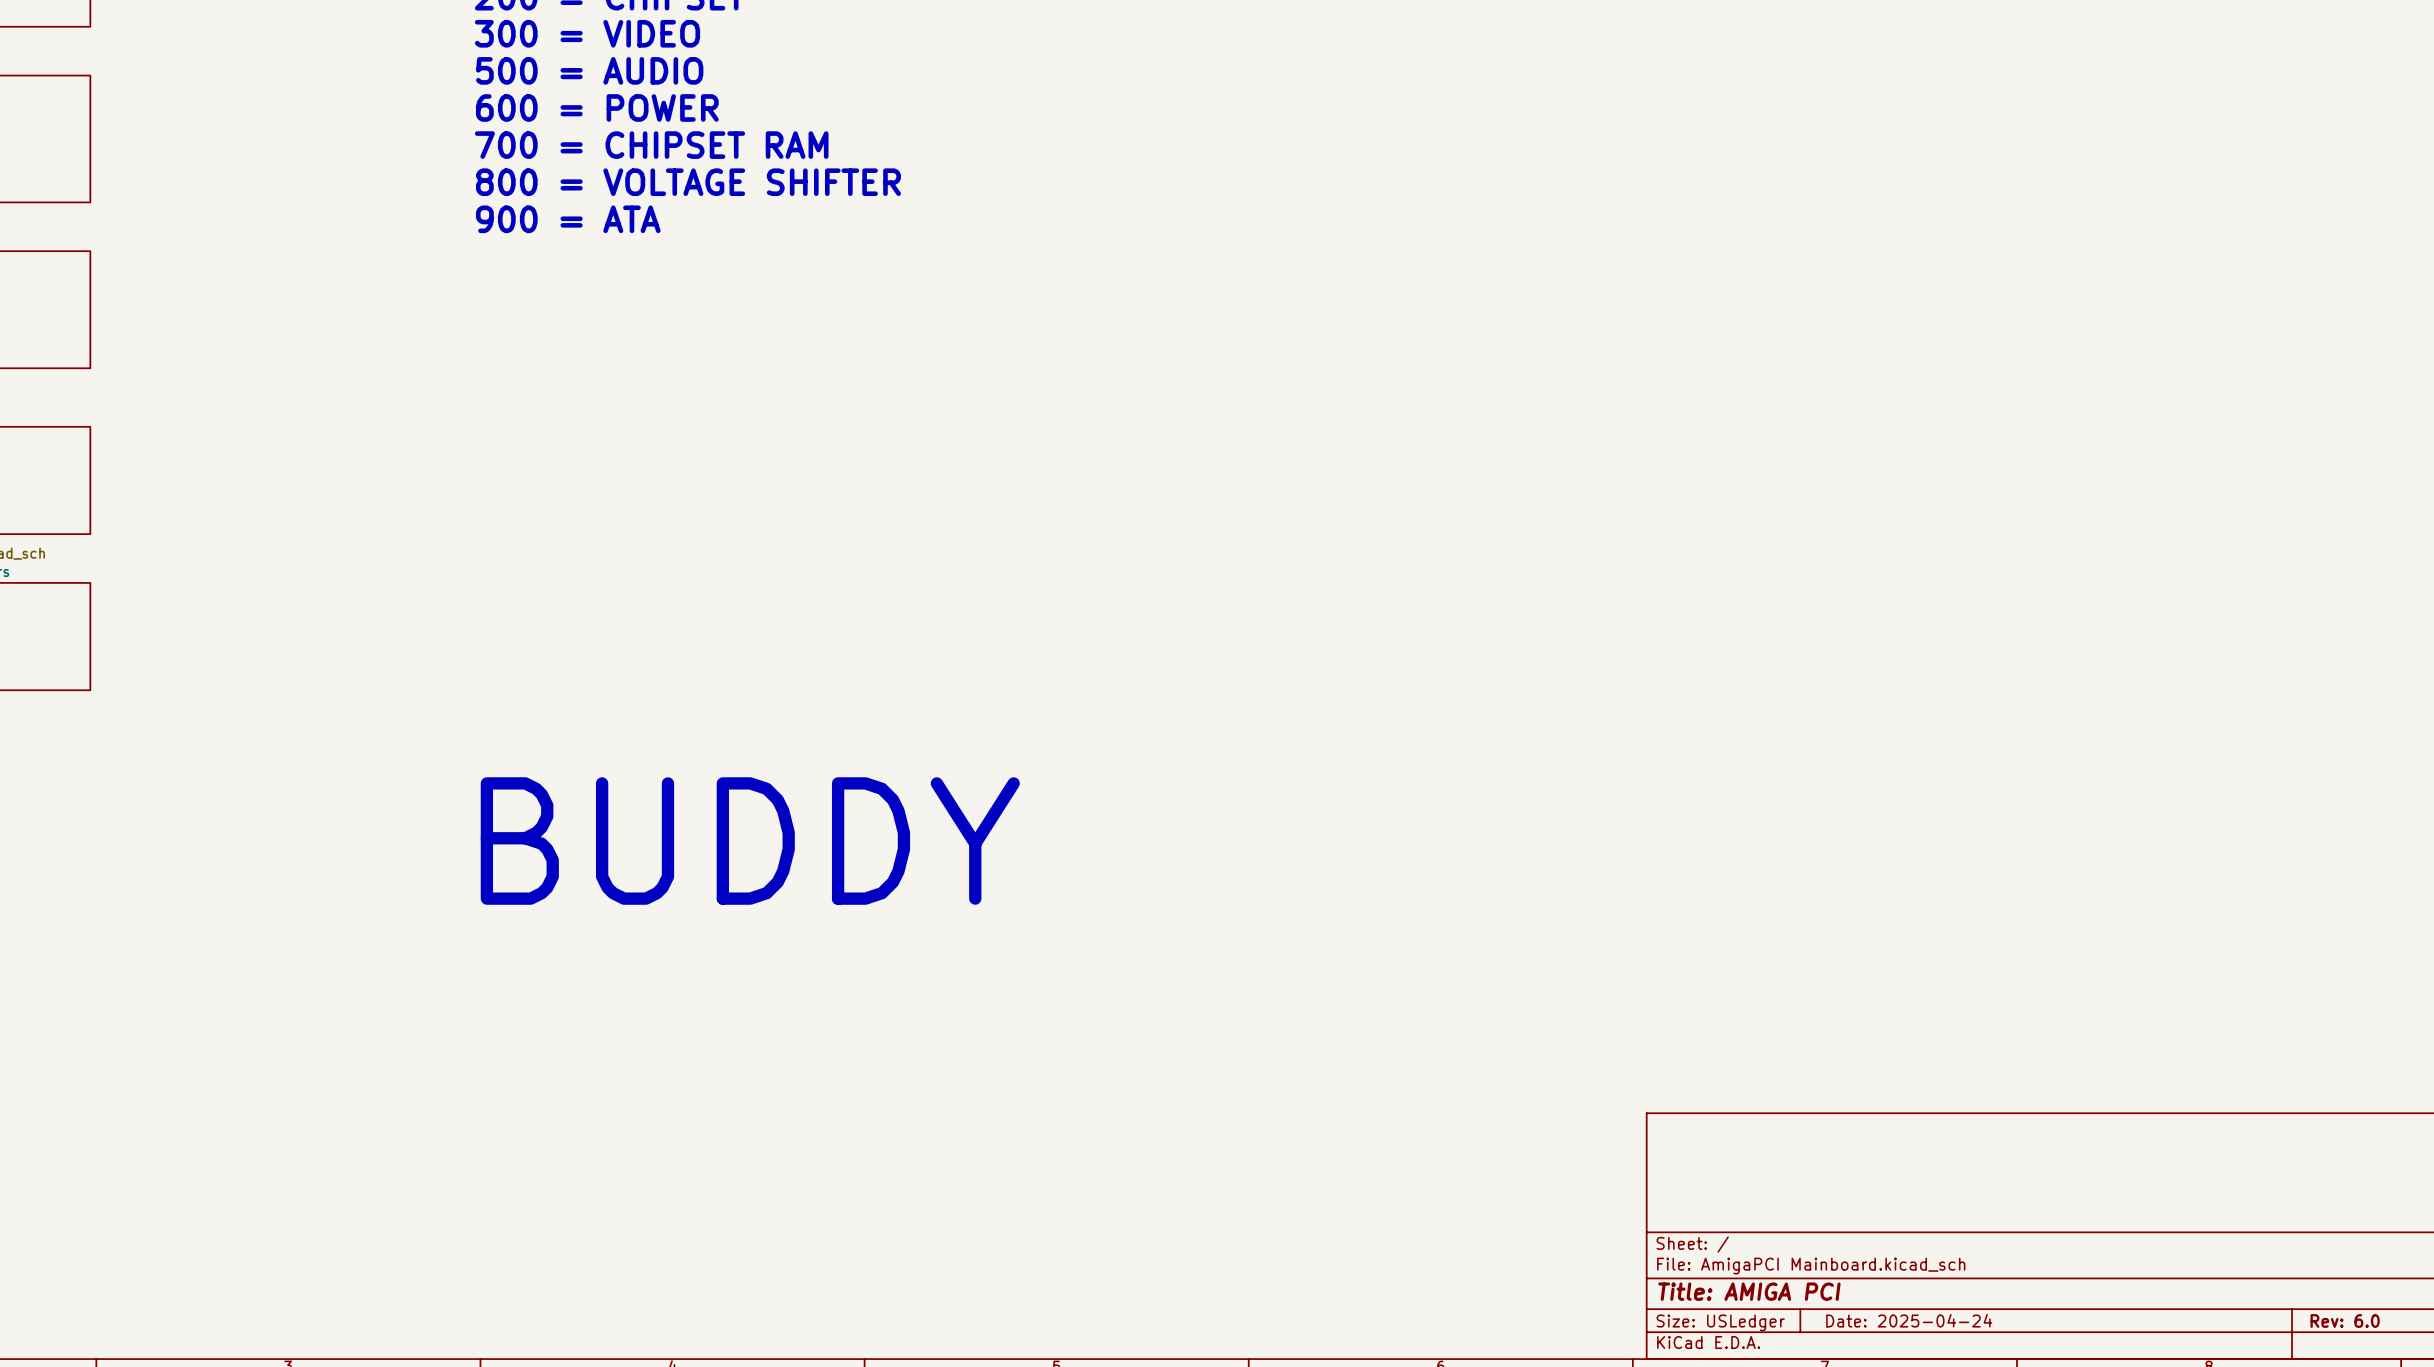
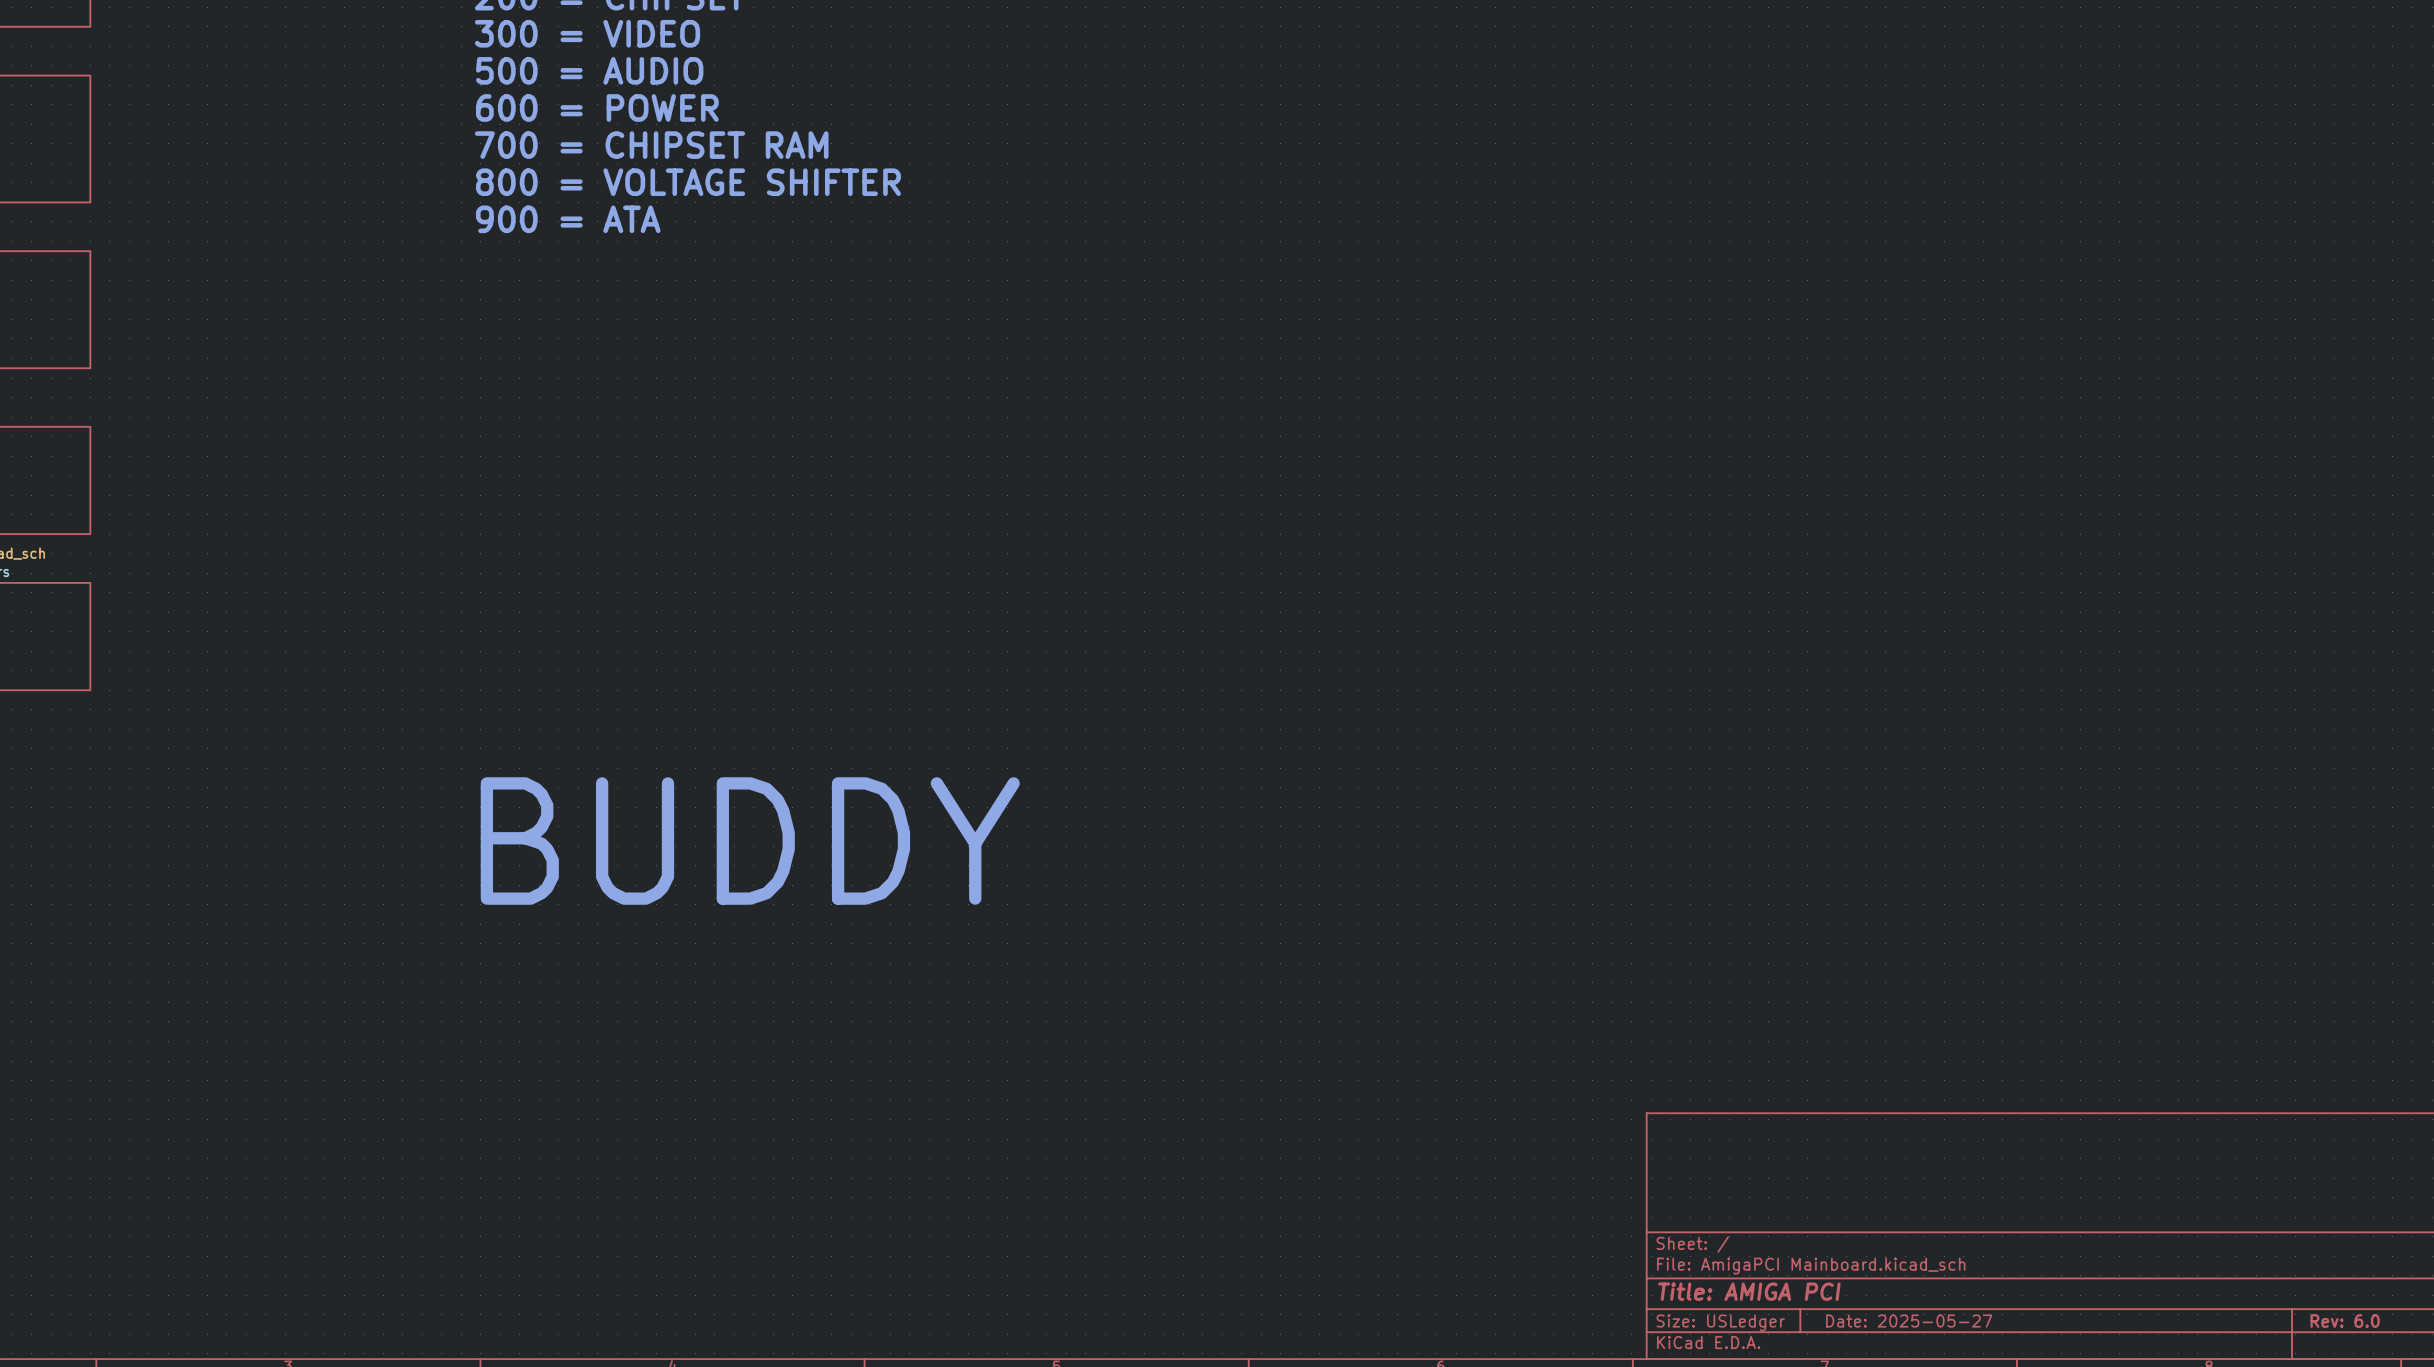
title block: Date: 2025-04-24 (1909, 1320) -> Date: 2025-05-27 (1909, 1321)

